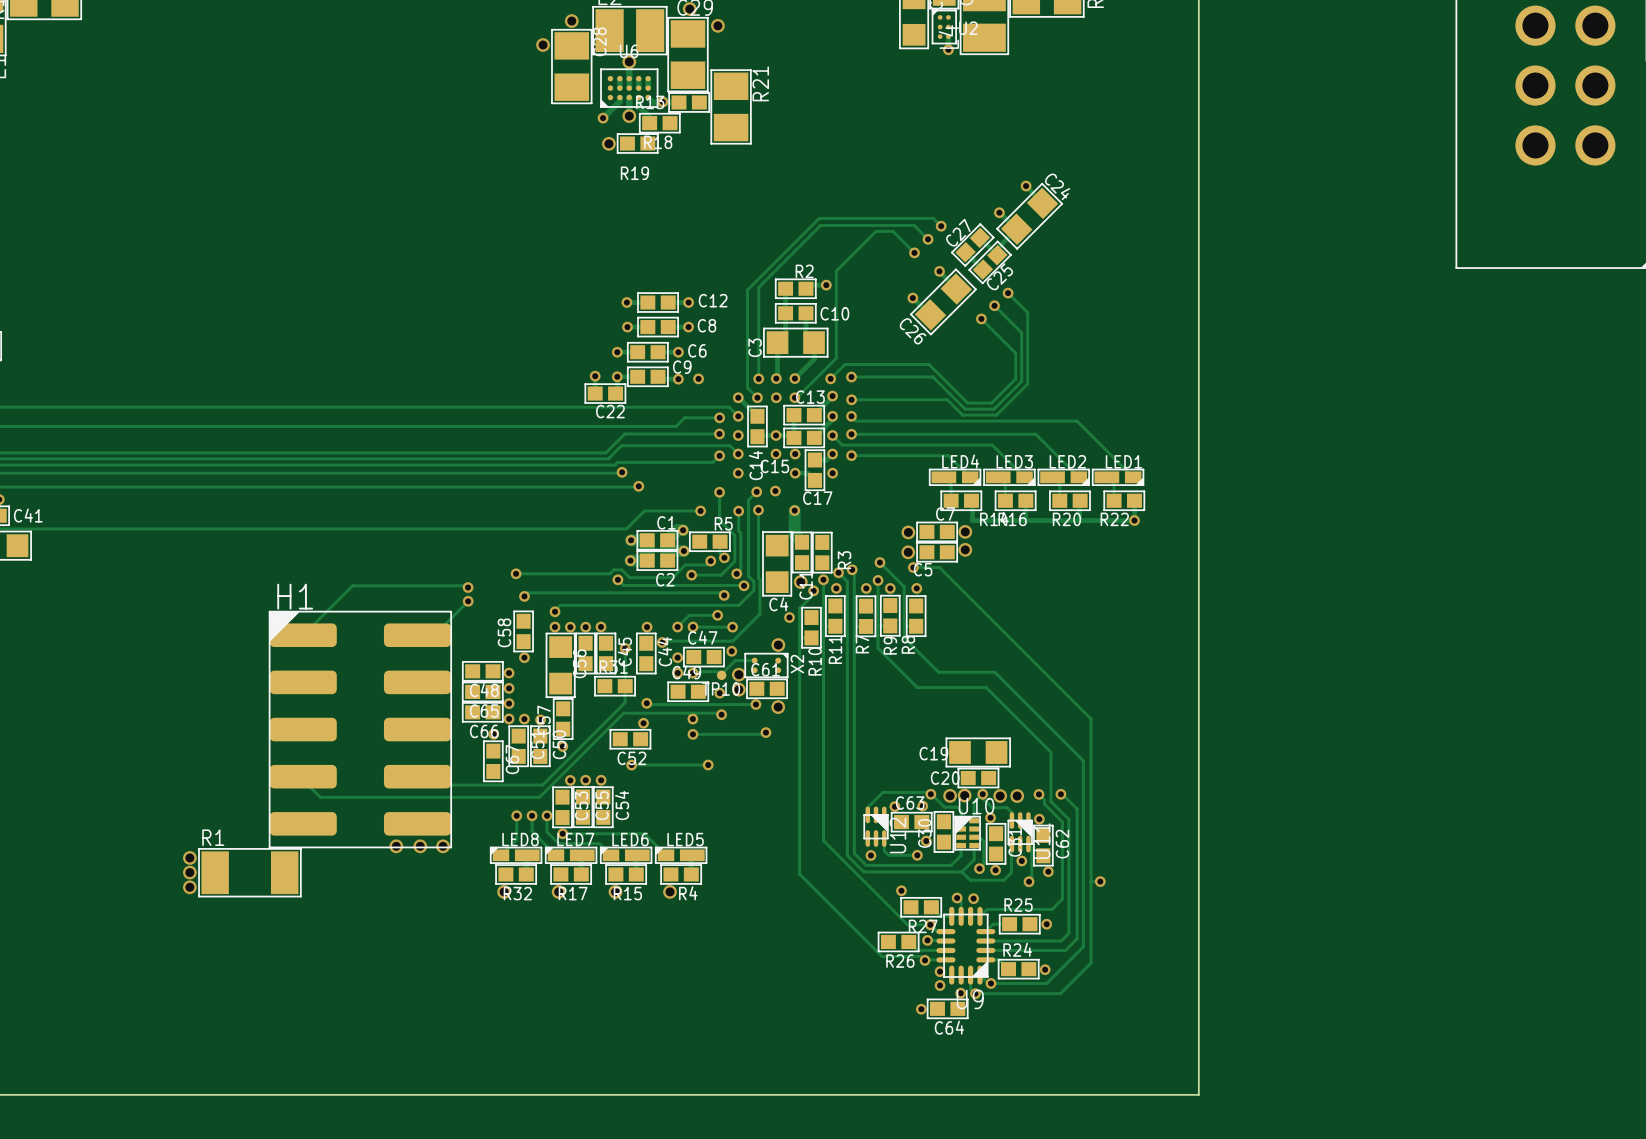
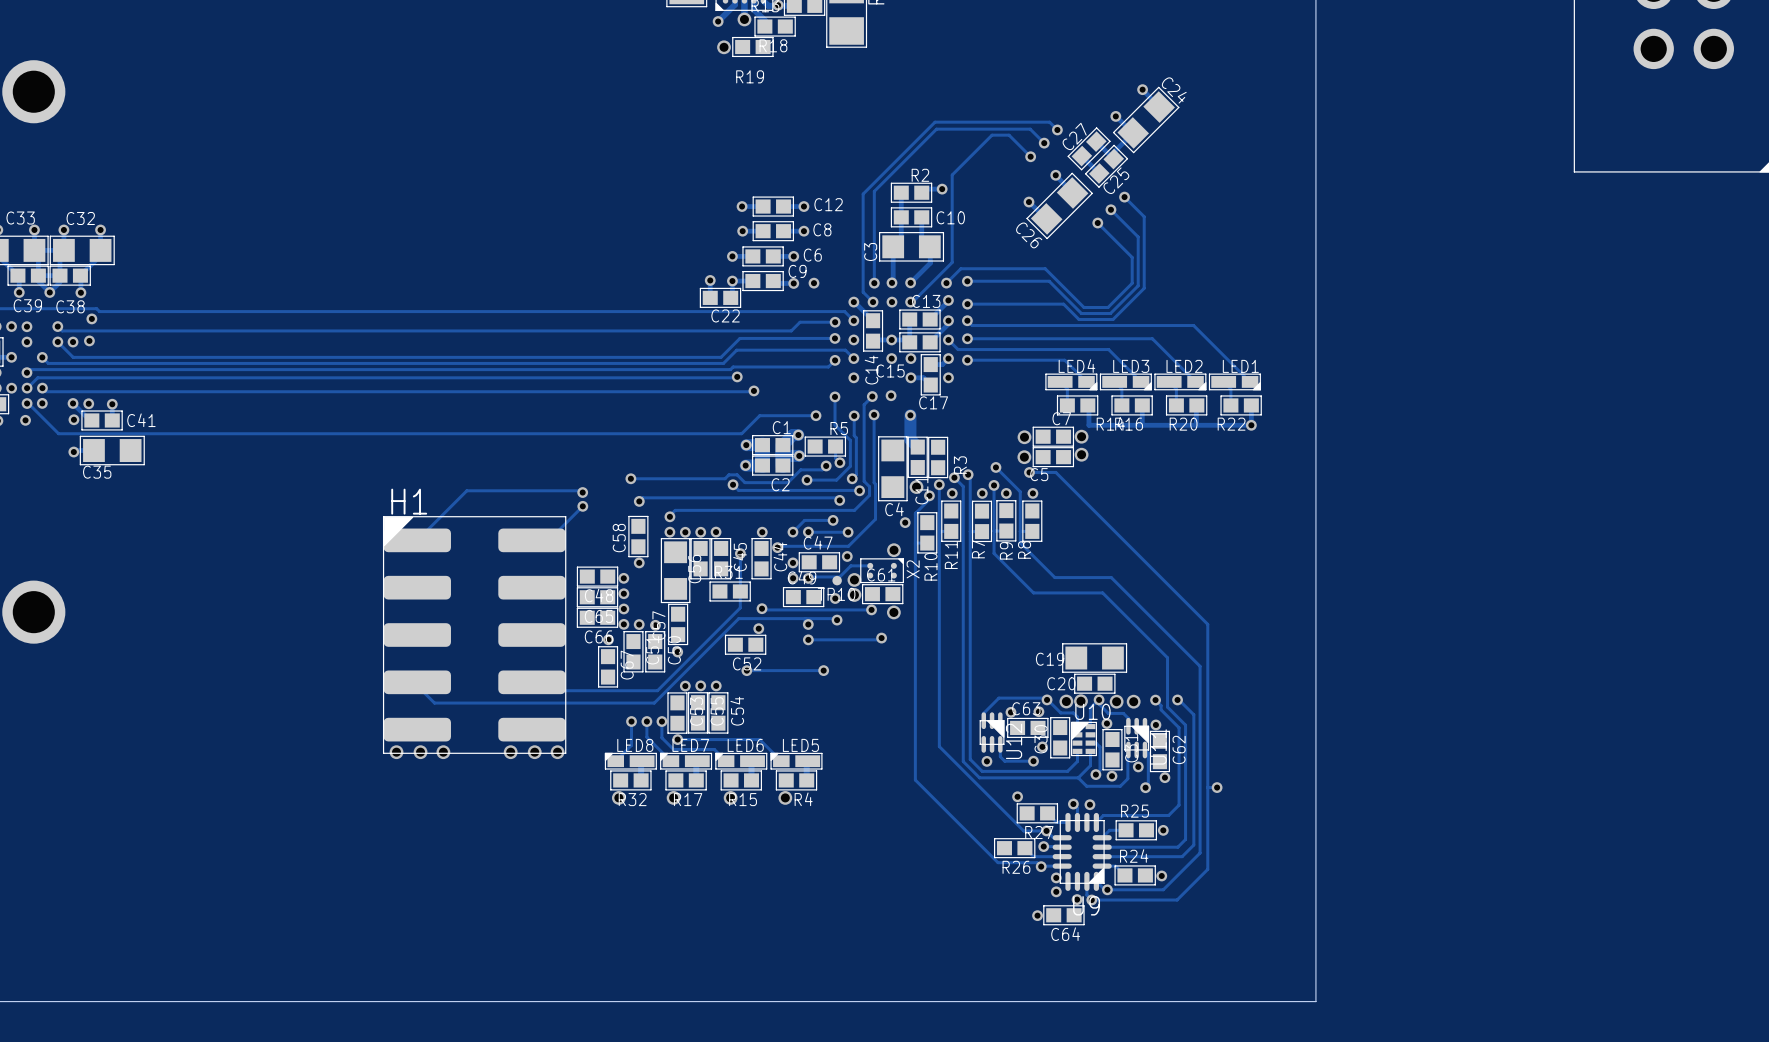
via: none -> (396, 752)
via: none -> (420, 752)
via: none -> (443, 752)
via: (189, 857) -> none
via: (189, 872) -> none
R1: (249, 872) -> none
via: (189, 887) -> none

